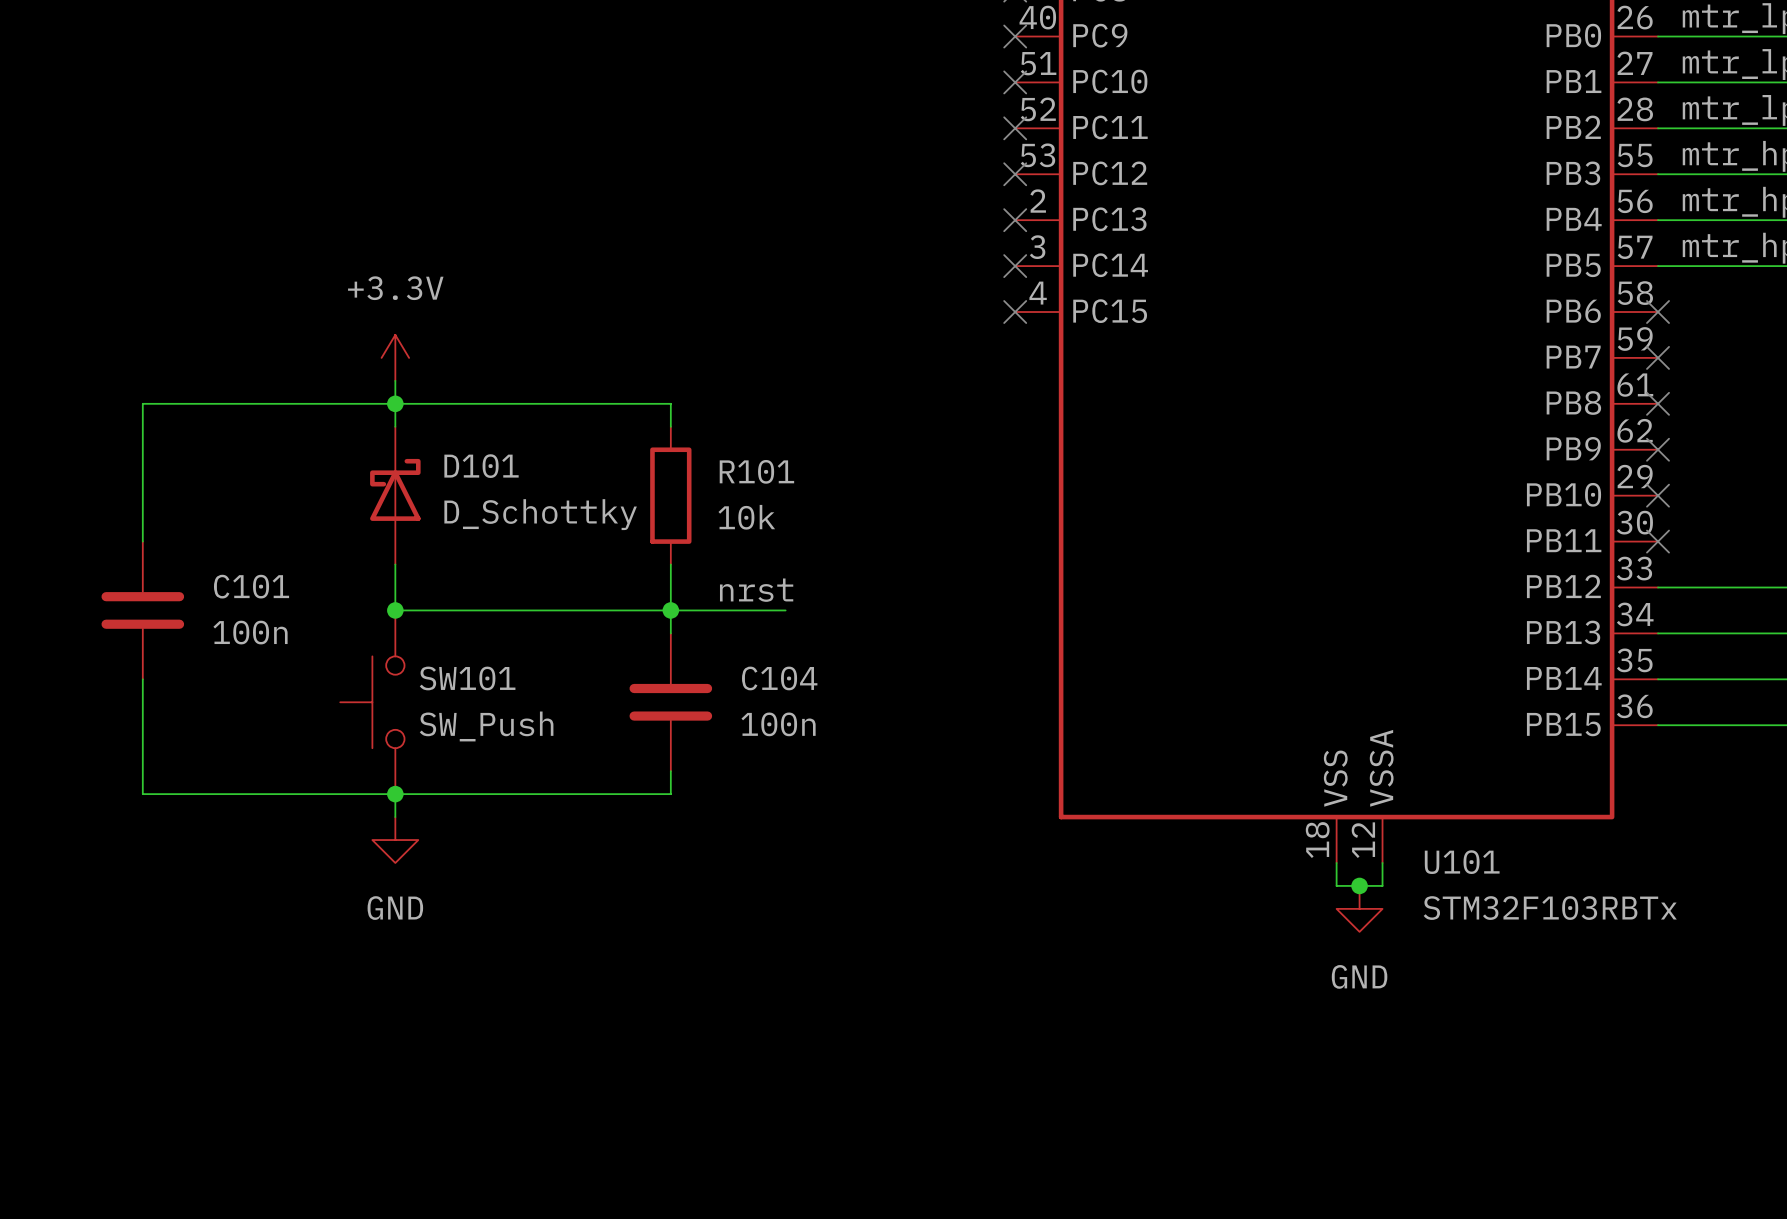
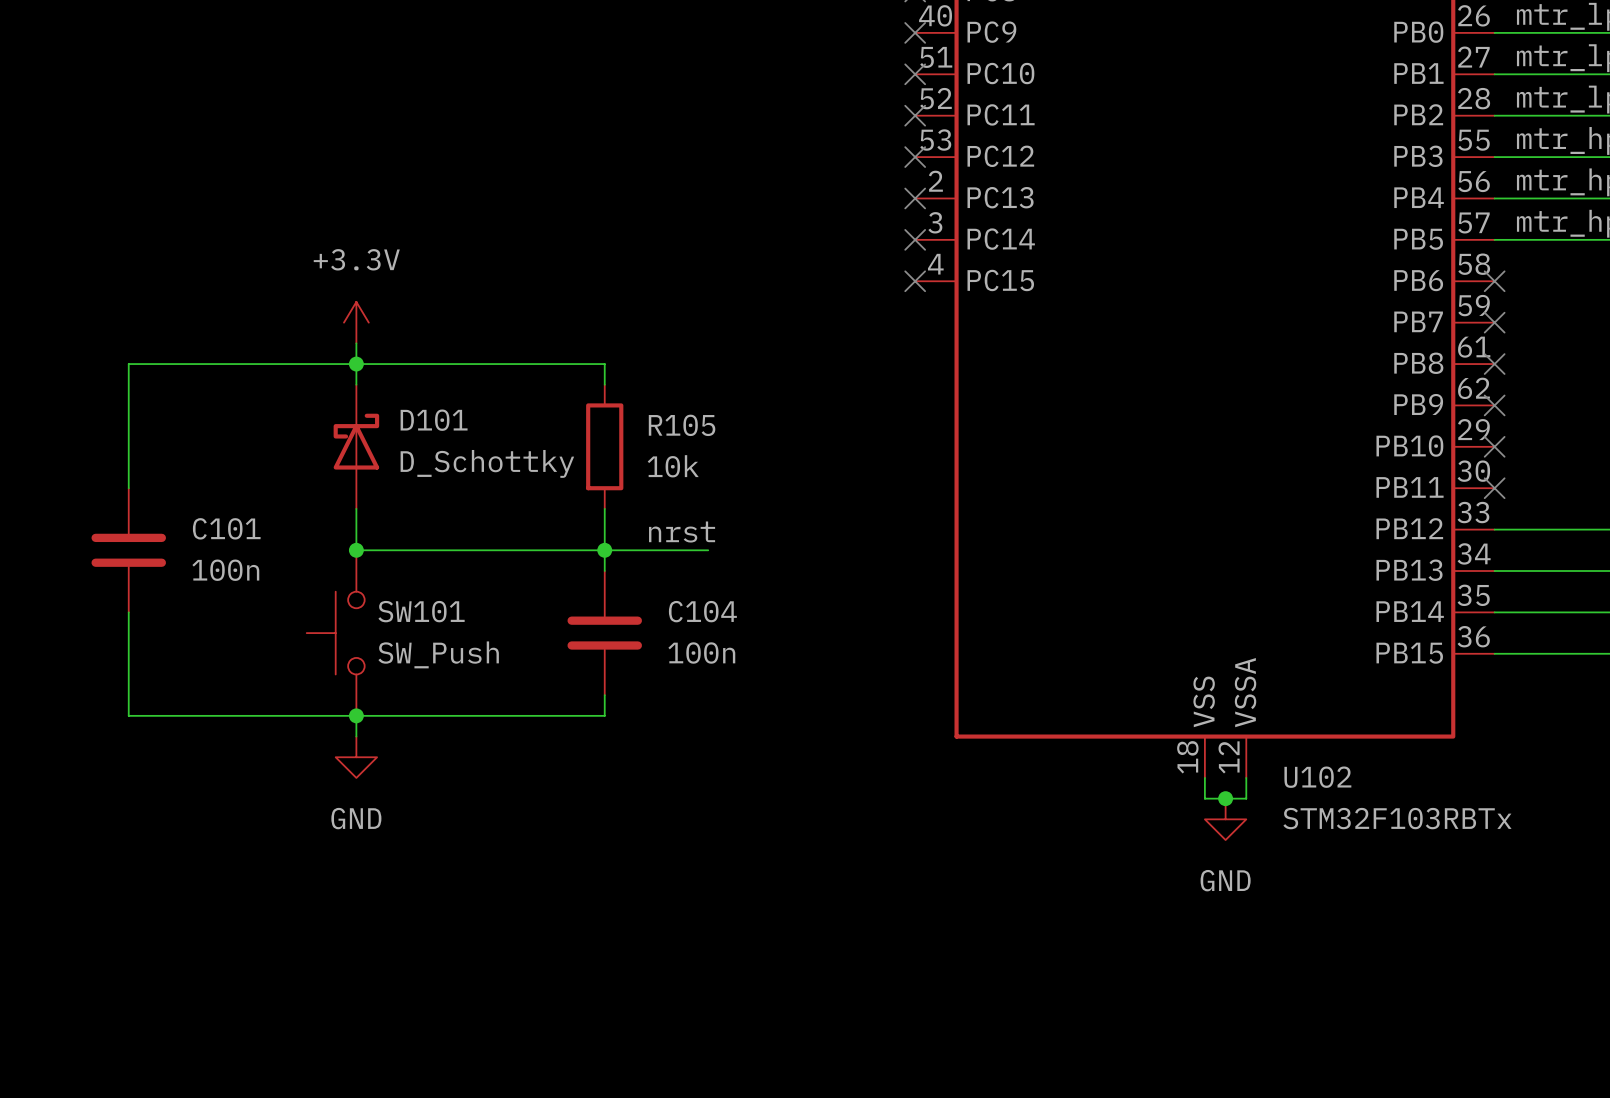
R101 name: R101 (756, 471) -> R105 (682, 425)
U101 name: U101 (1462, 862) -> U102 (1317, 777)

